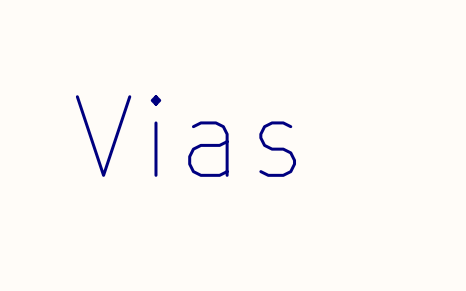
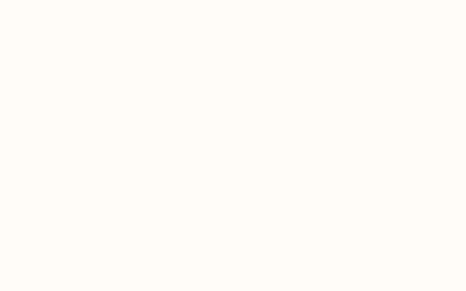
text: Vias (185, 136) -> none

